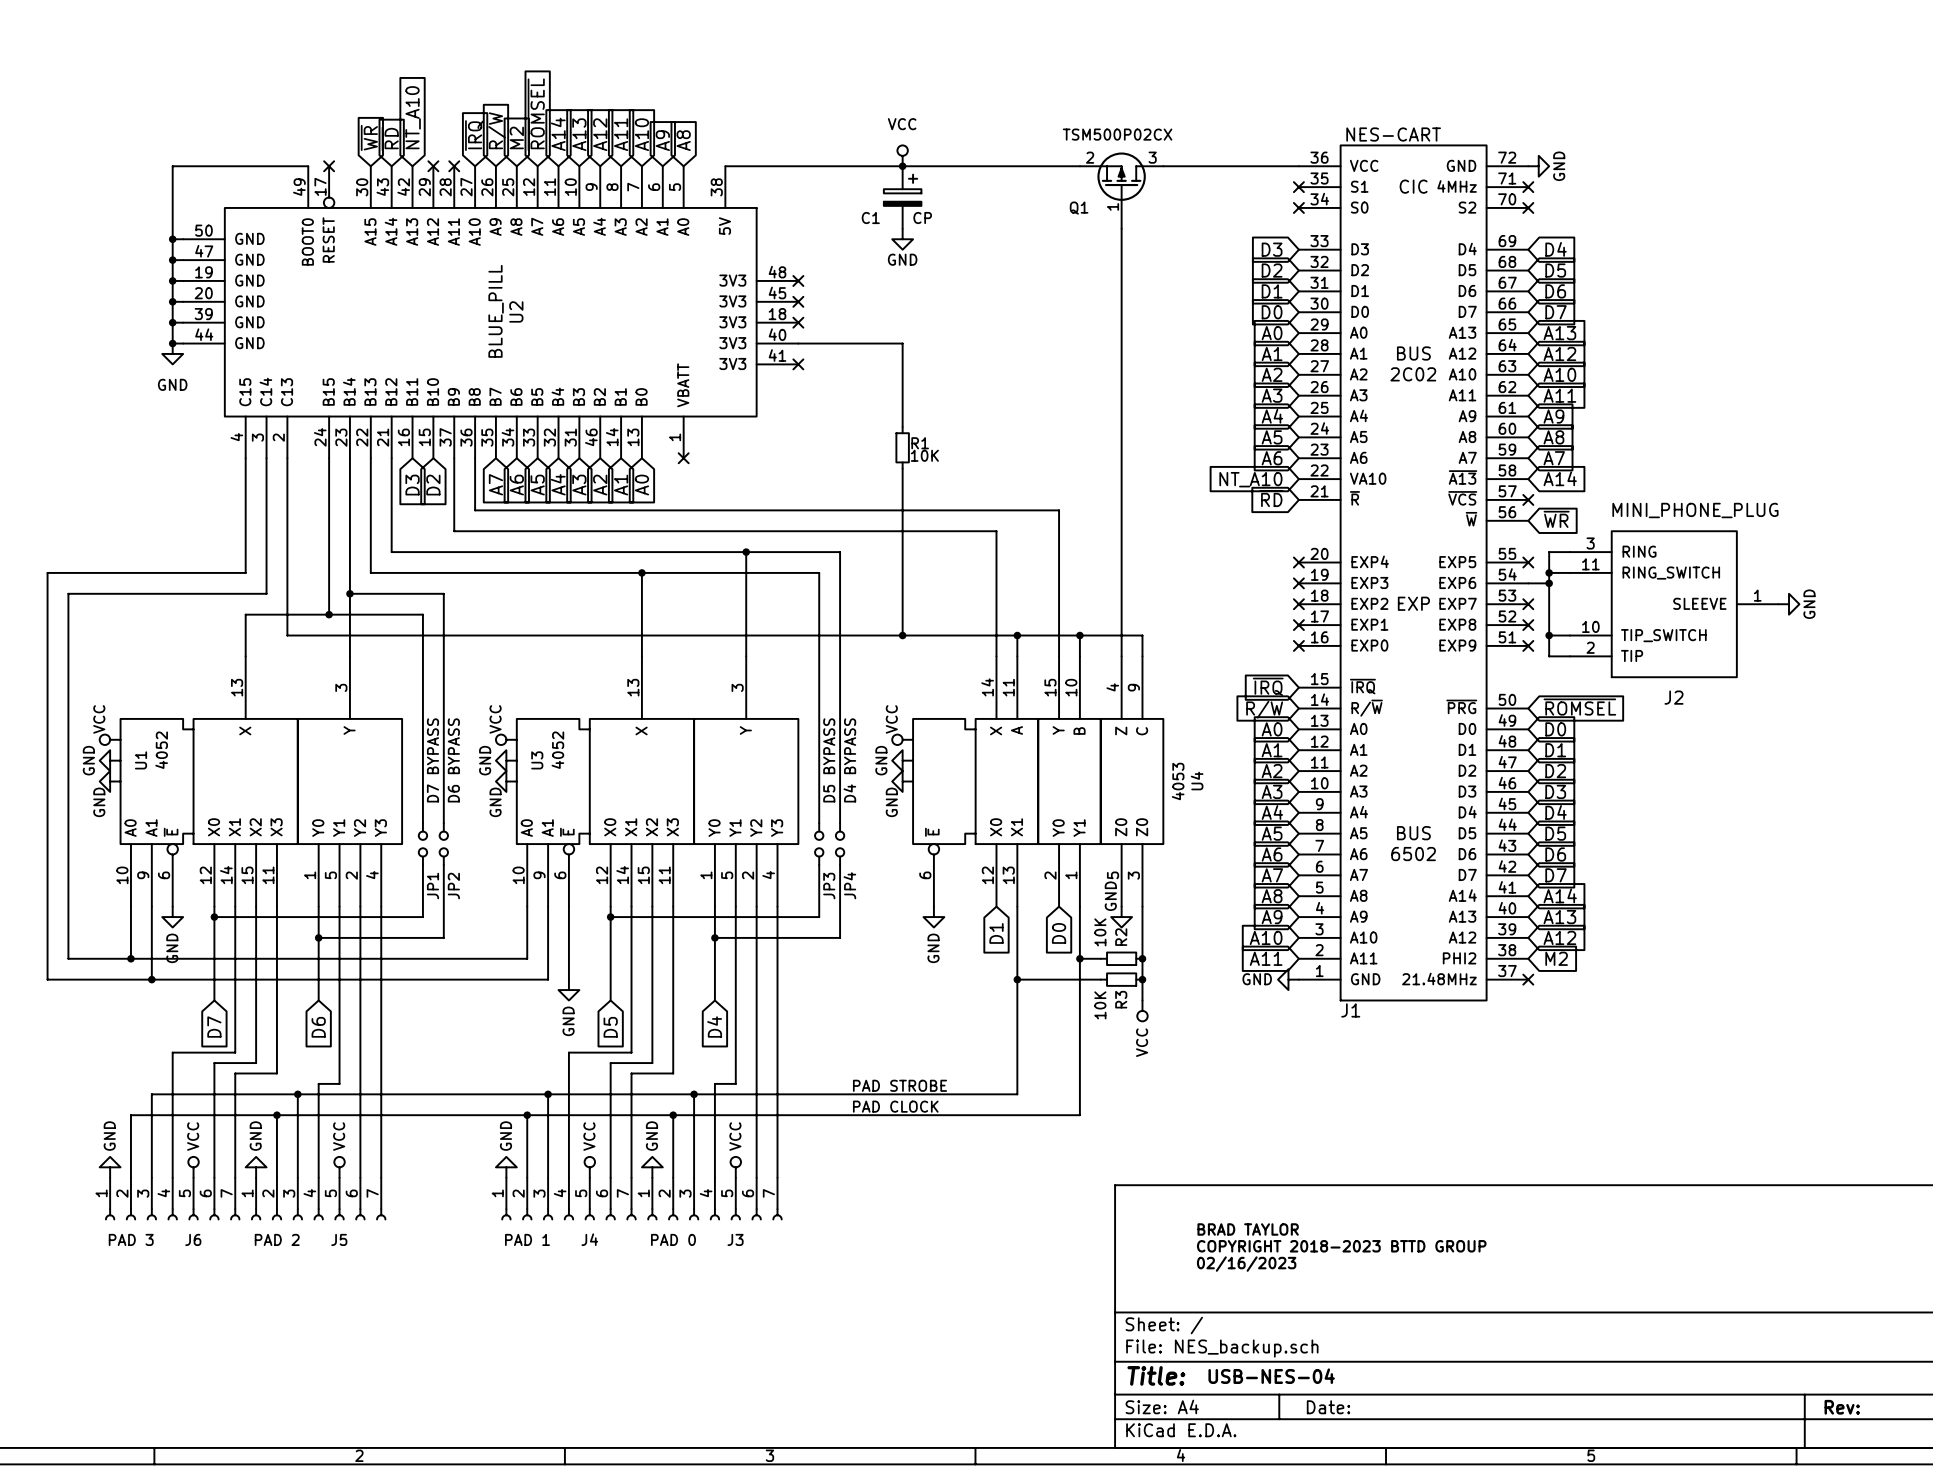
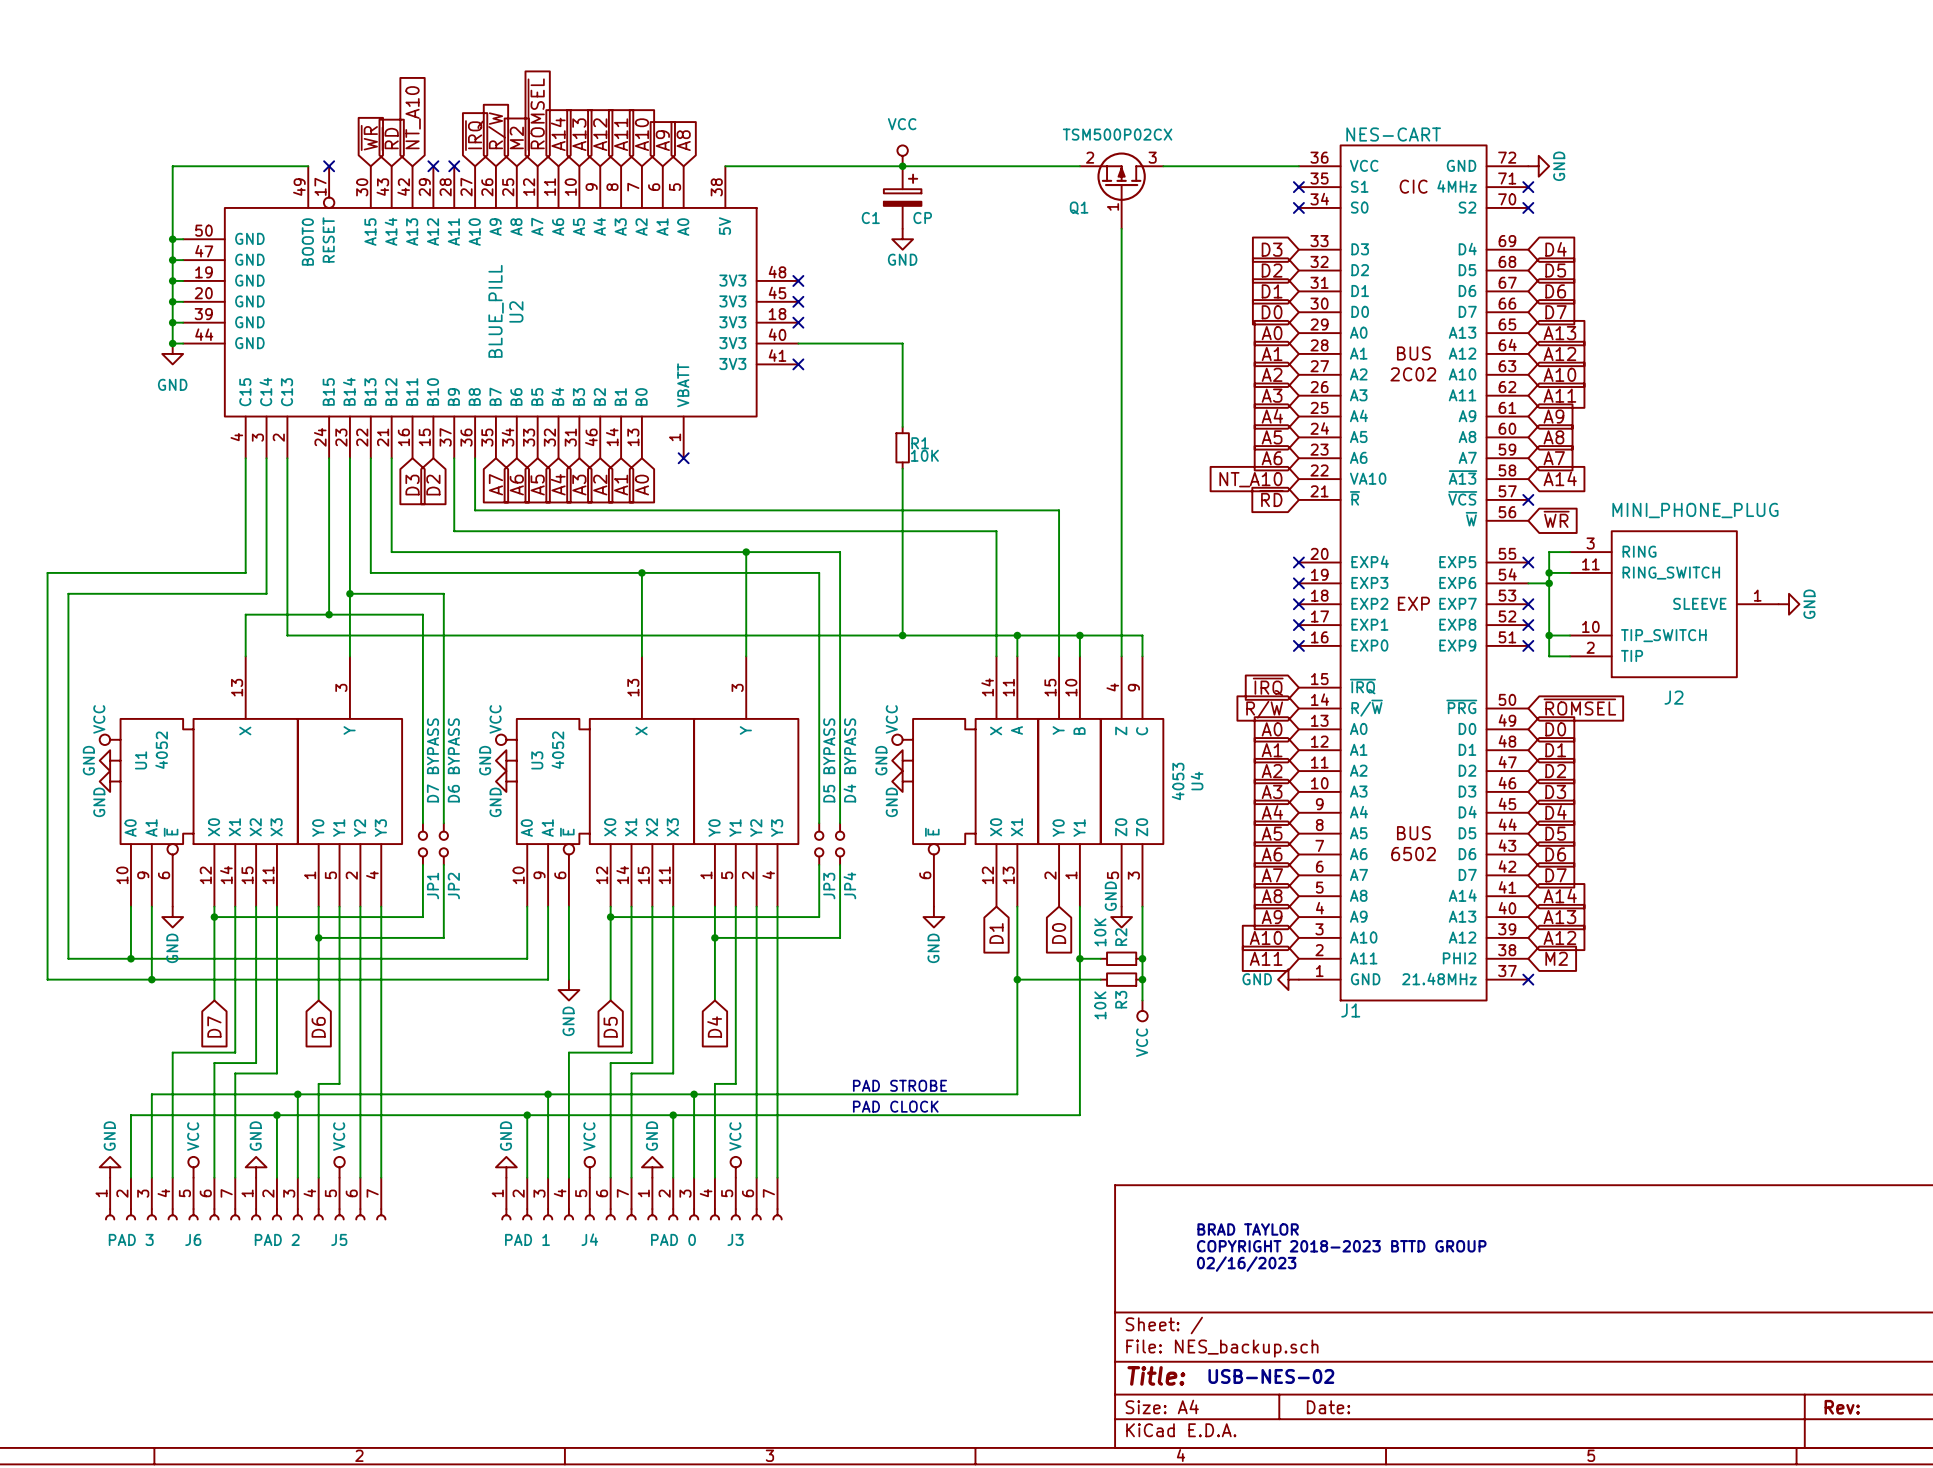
text: USB-NES-04 (1271, 1376) -> USB-NES-02 (1271, 1376)

